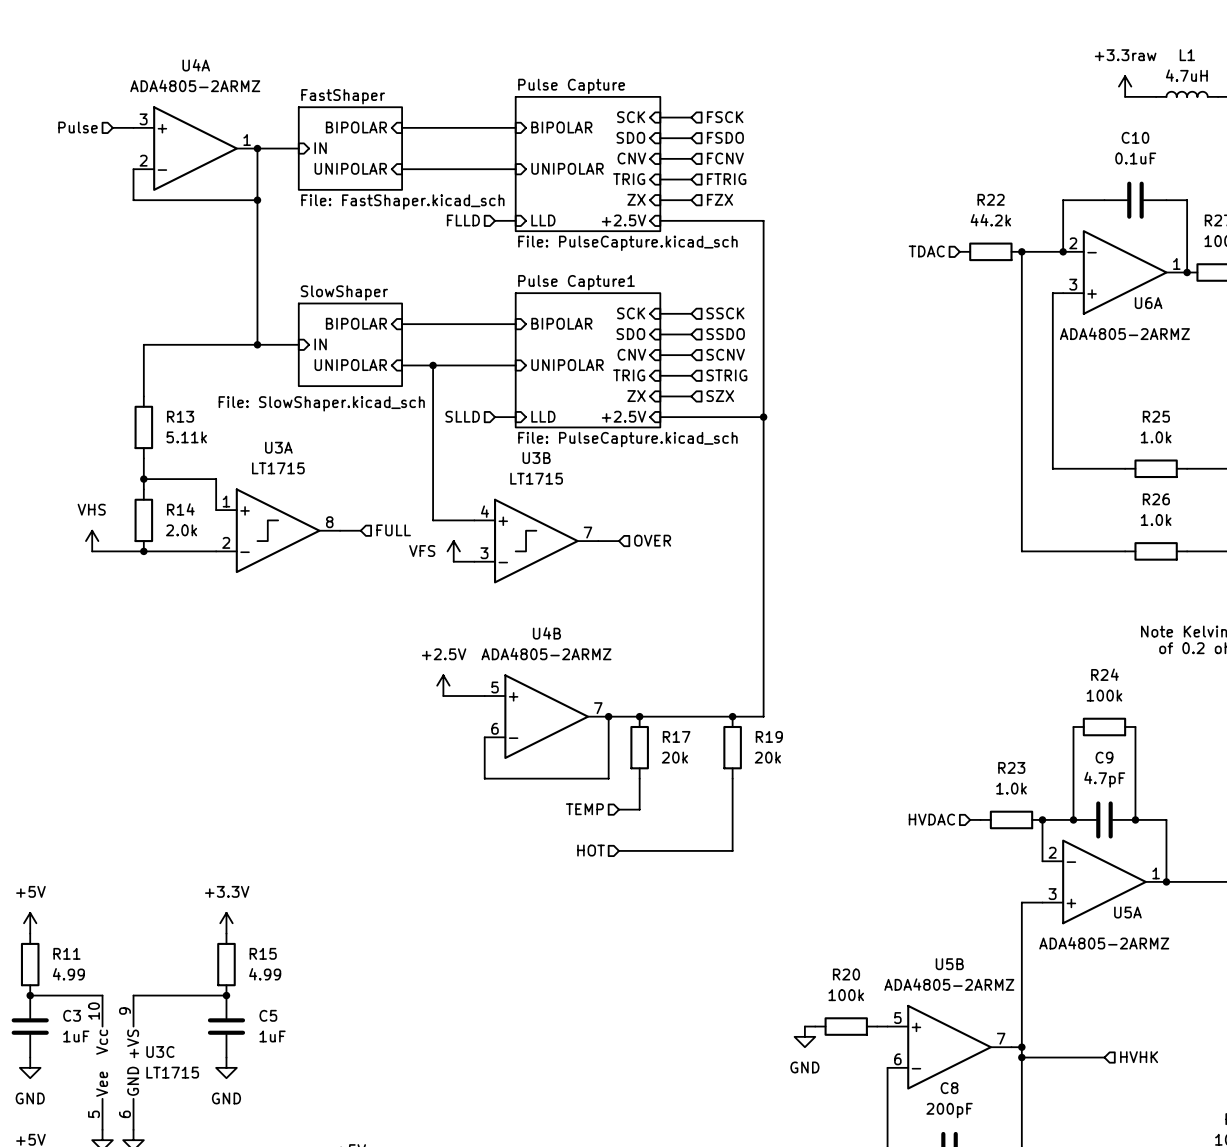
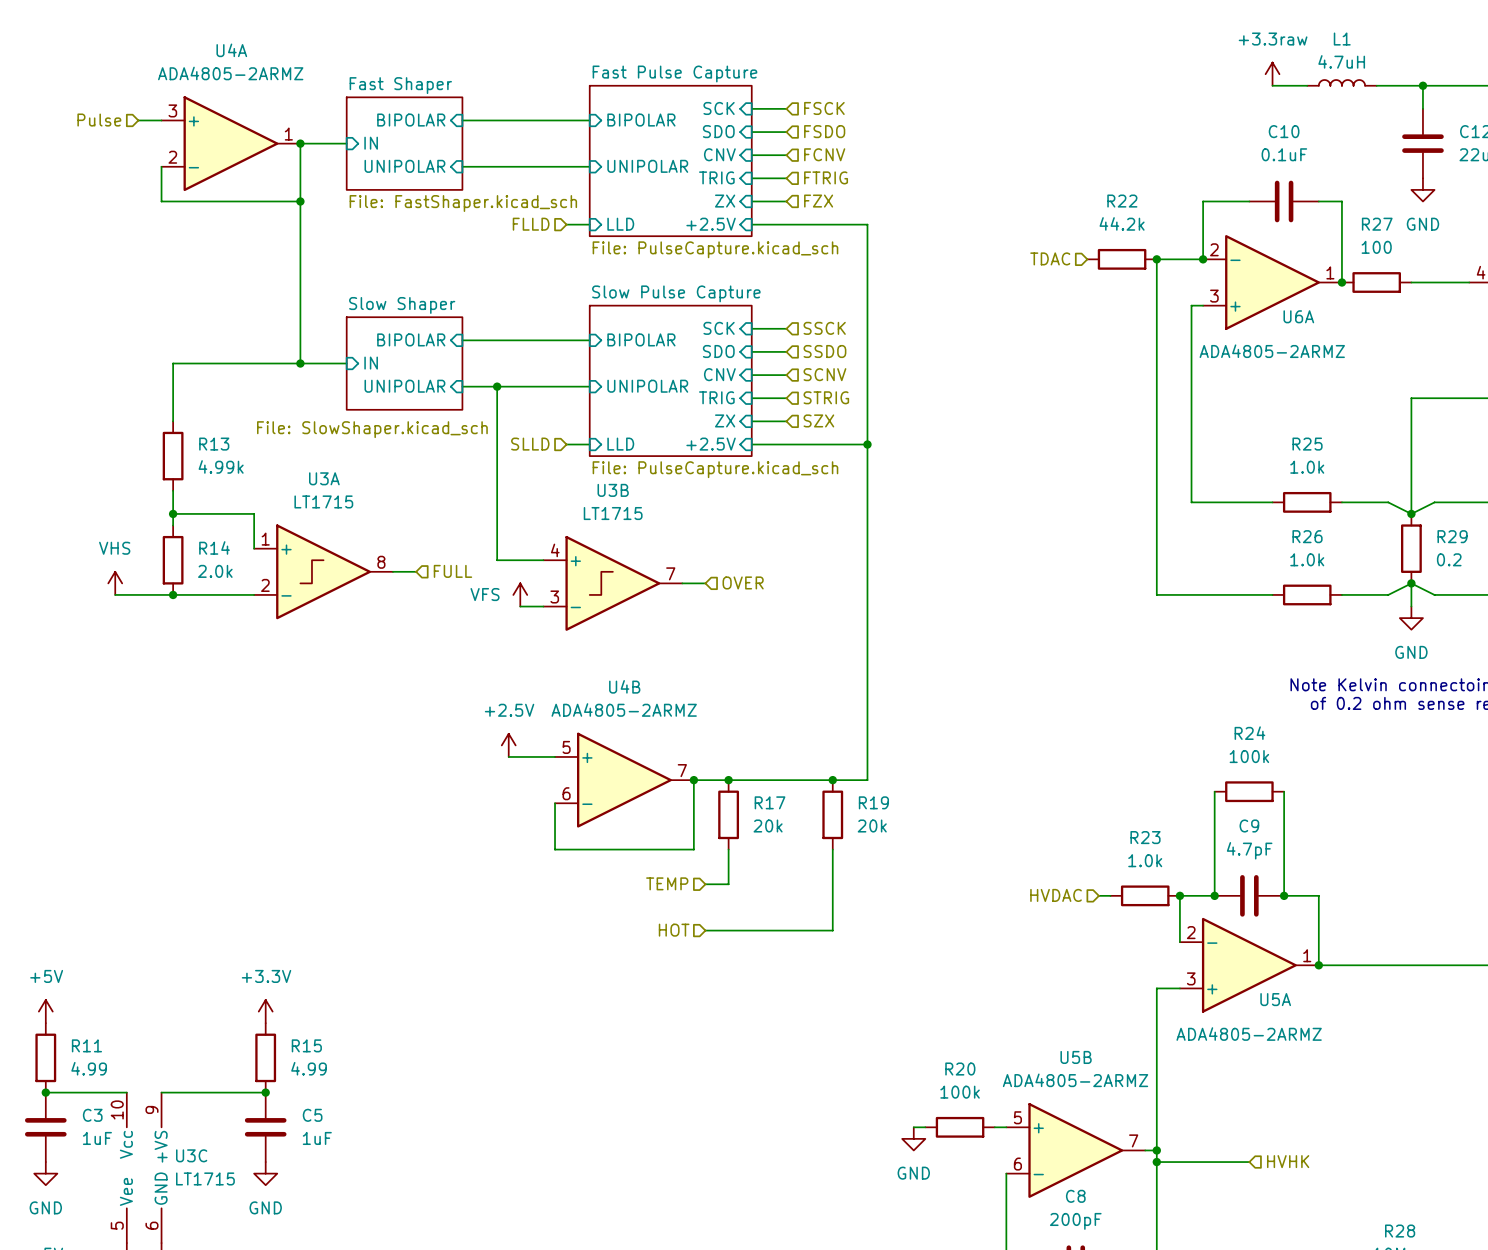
sheet Pulse Capture name: Pulse Capture (571, 86) -> Fast Pulse Capture (674, 74)
sheet FastShaper name: FastShaper (343, 96) -> Fast Shaper (400, 85)
sheet Pulse Capture1 name: Pulse Capture1 (576, 282) -> Slow Pulse Capture (676, 293)
sheet SlowShaper name: SlowShaper (344, 292) -> Slow Shaper (402, 305)
R13 value: 5.11k (186, 437) -> 4.99k (221, 466)

